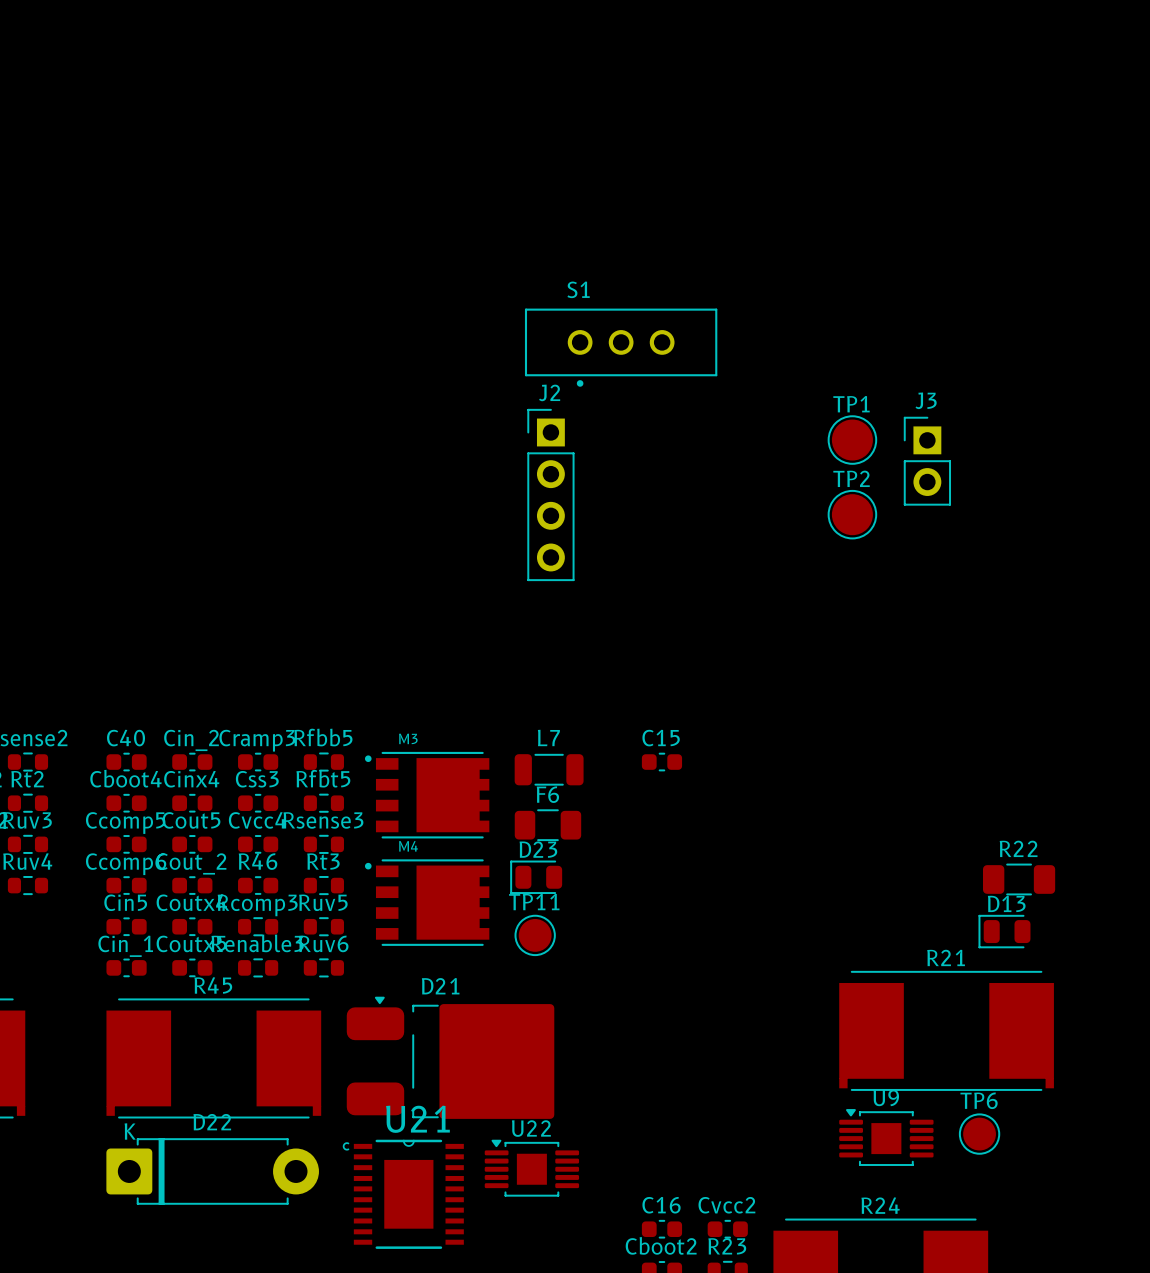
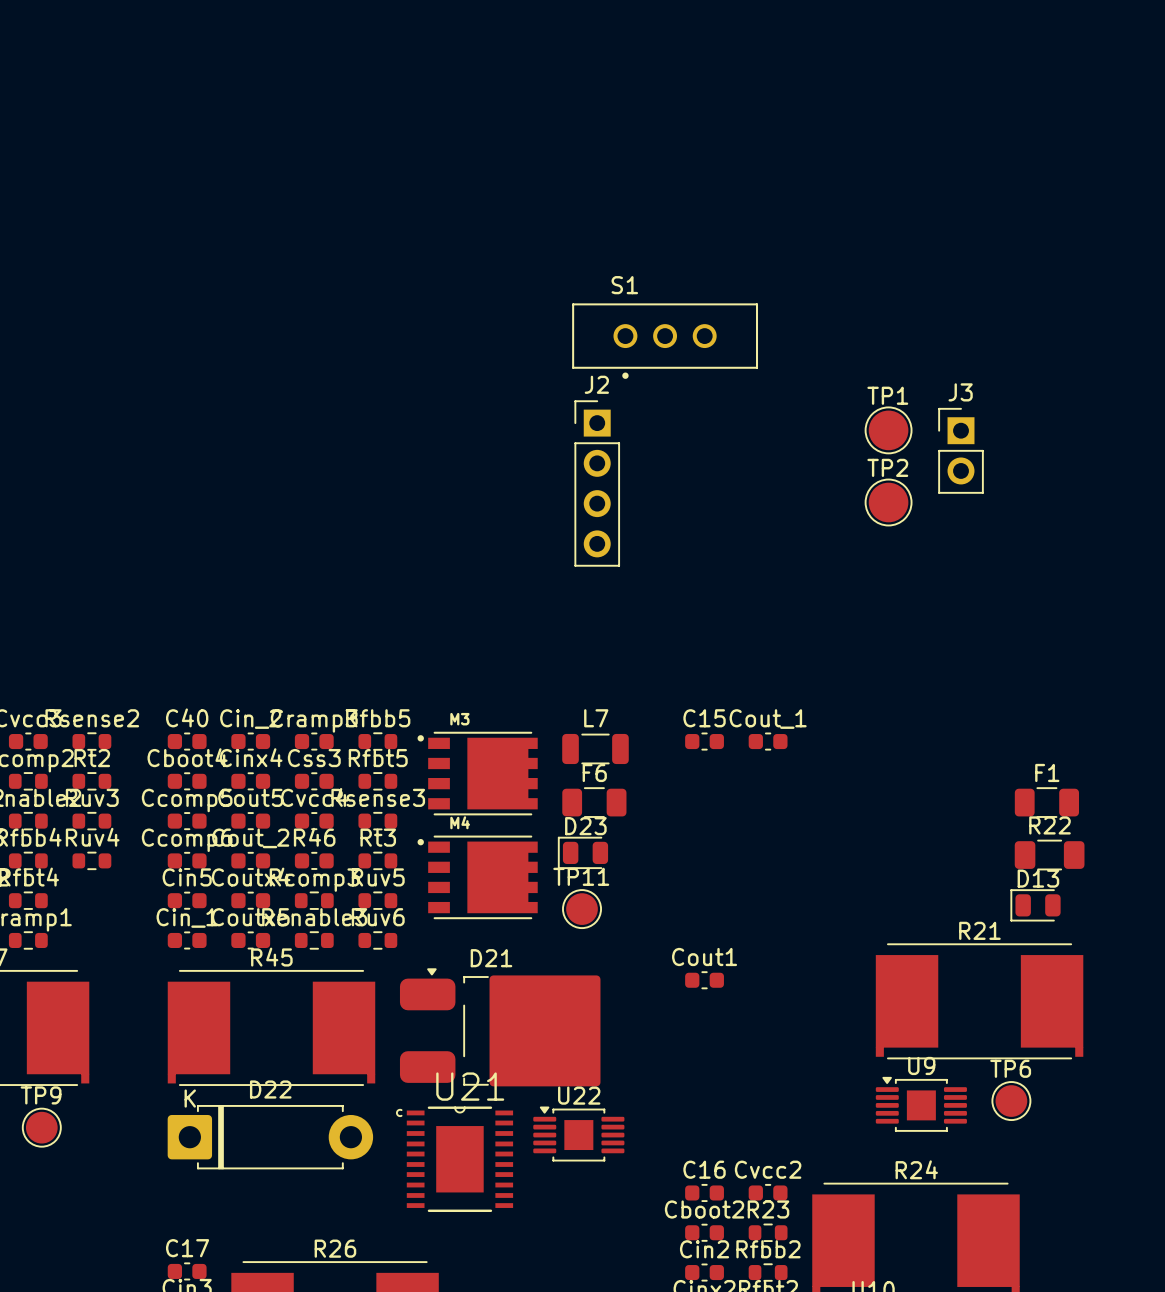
Cout_1: none -> (768, 741)
F1: none -> (1046, 802)
Cout1: none -> (704, 980)

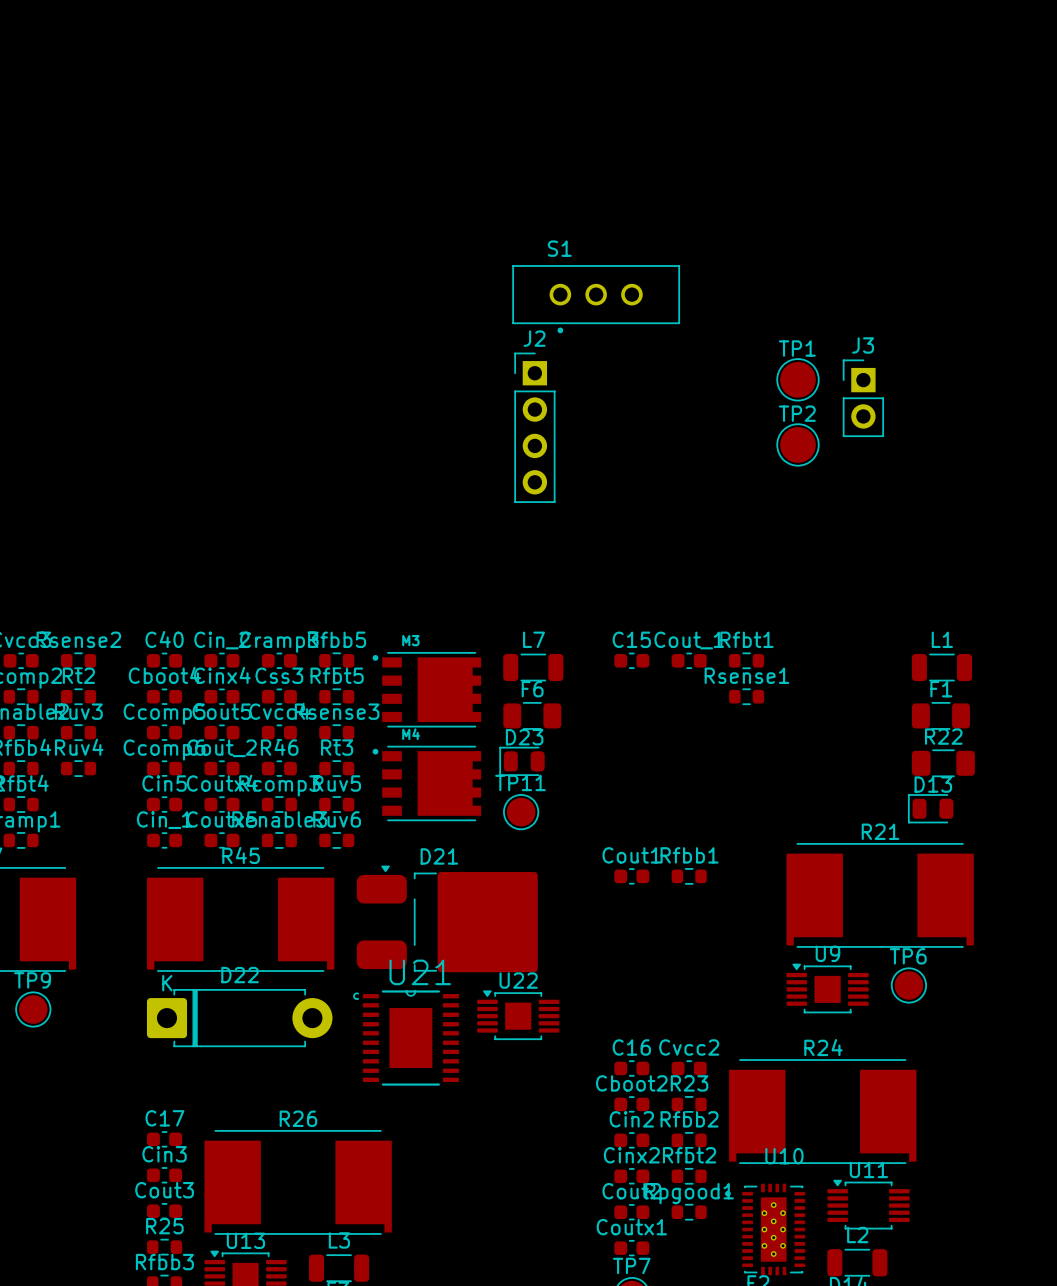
Rfbt1: none -> (746, 660)
L1: none -> (941, 667)
Rsense1: none -> (746, 696)
Rfbb1: none -> (689, 876)

